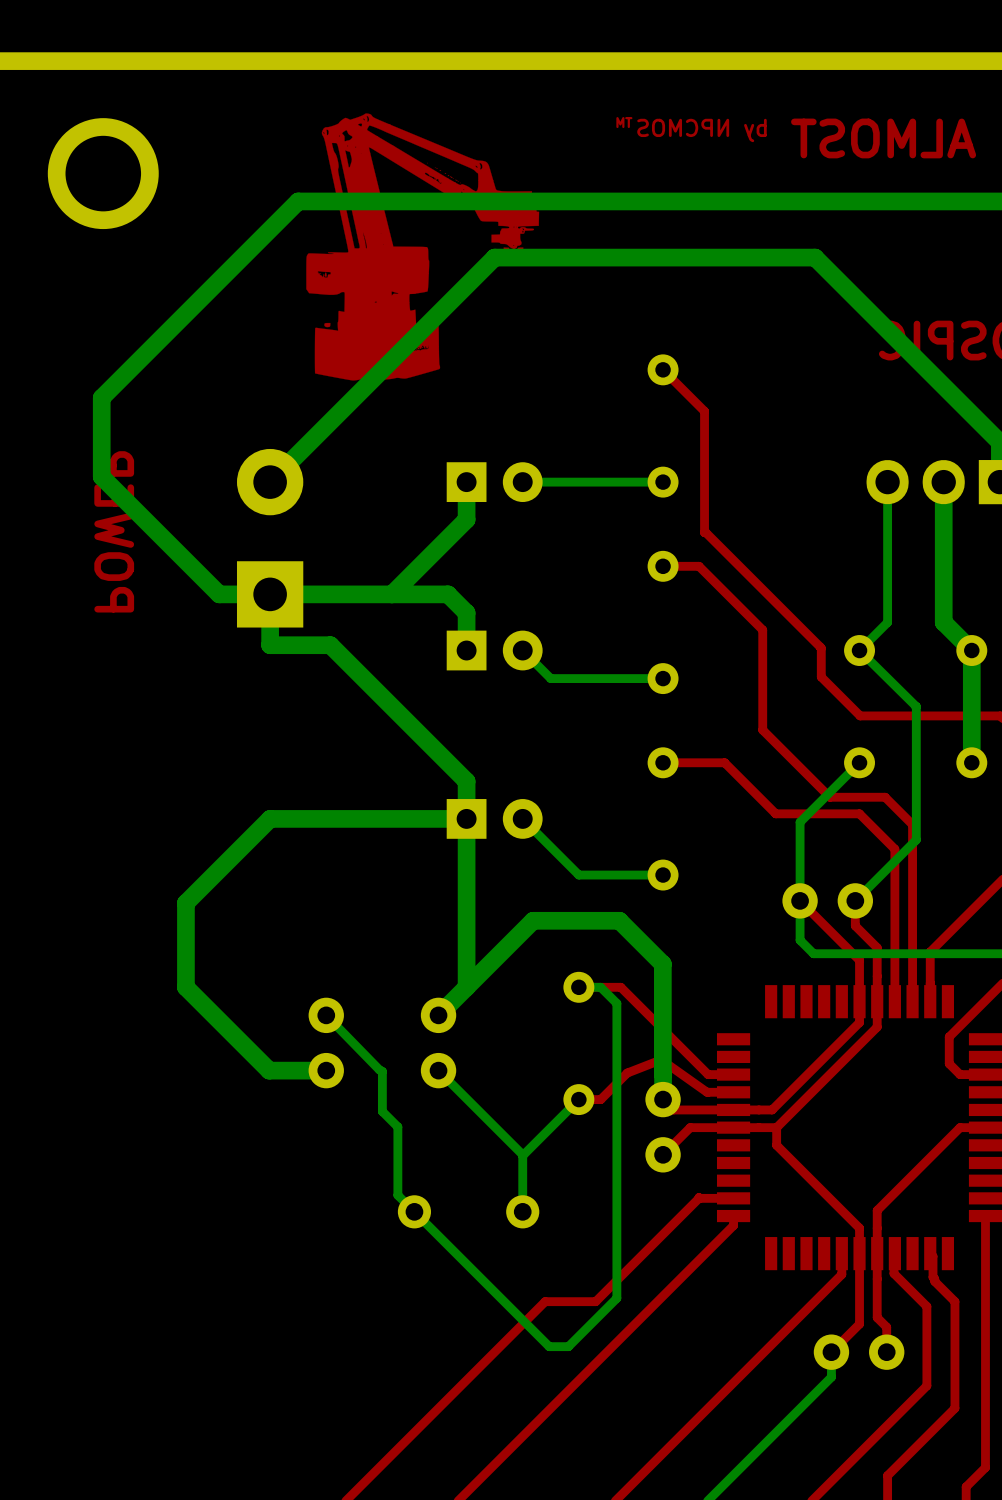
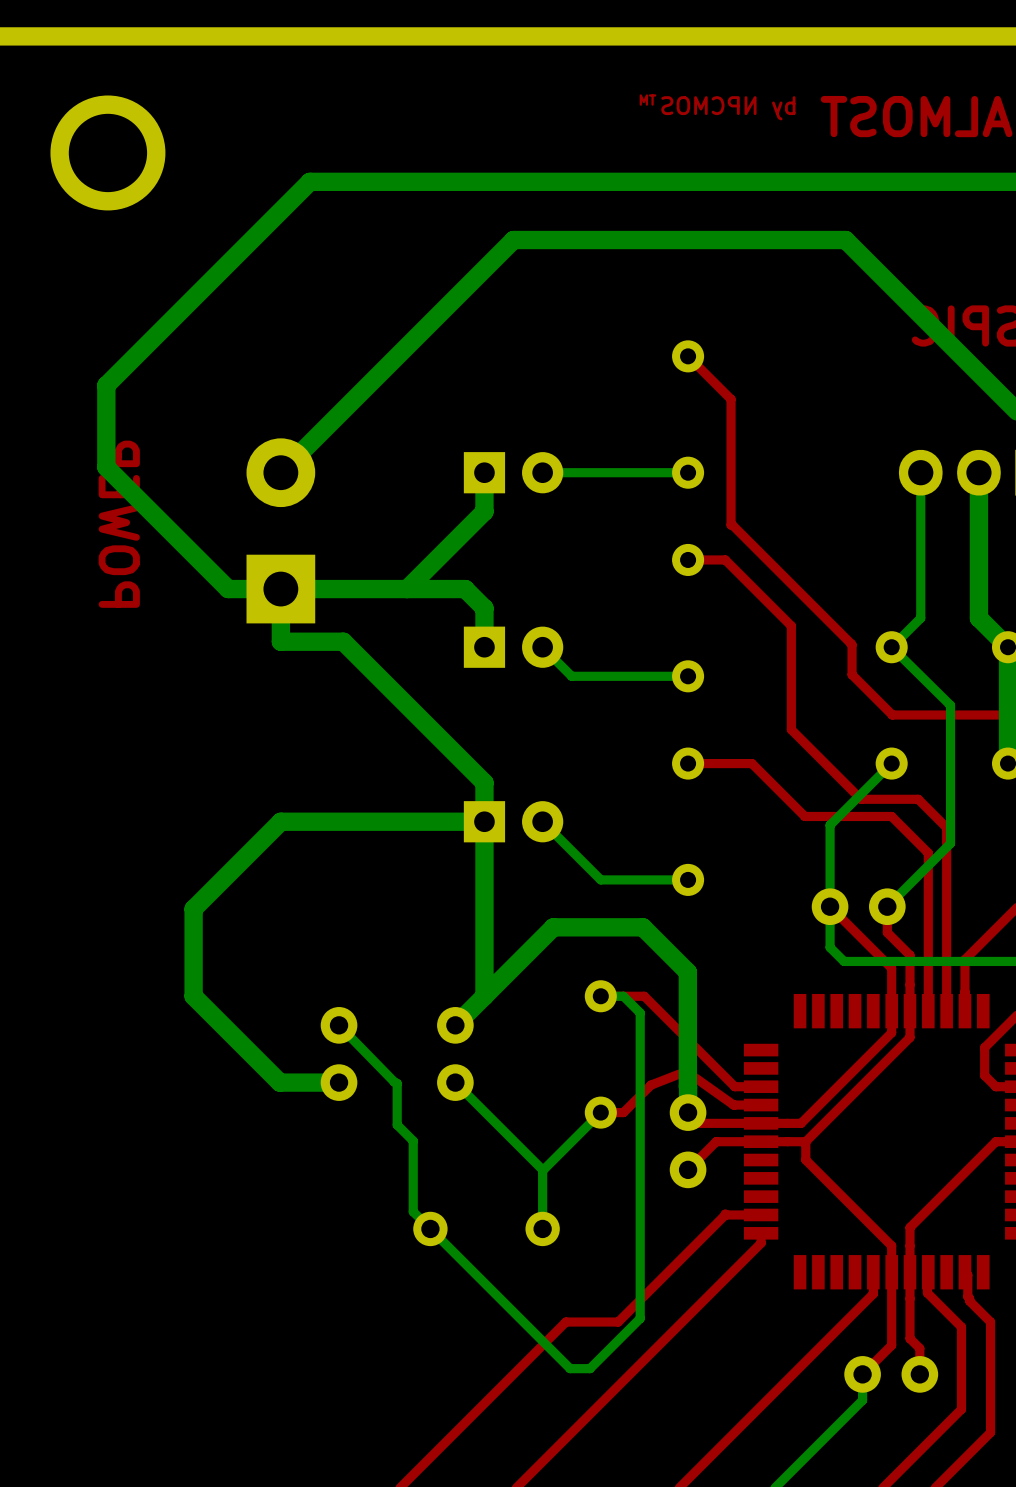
drawing: [306, 113, 540, 381] -> none

